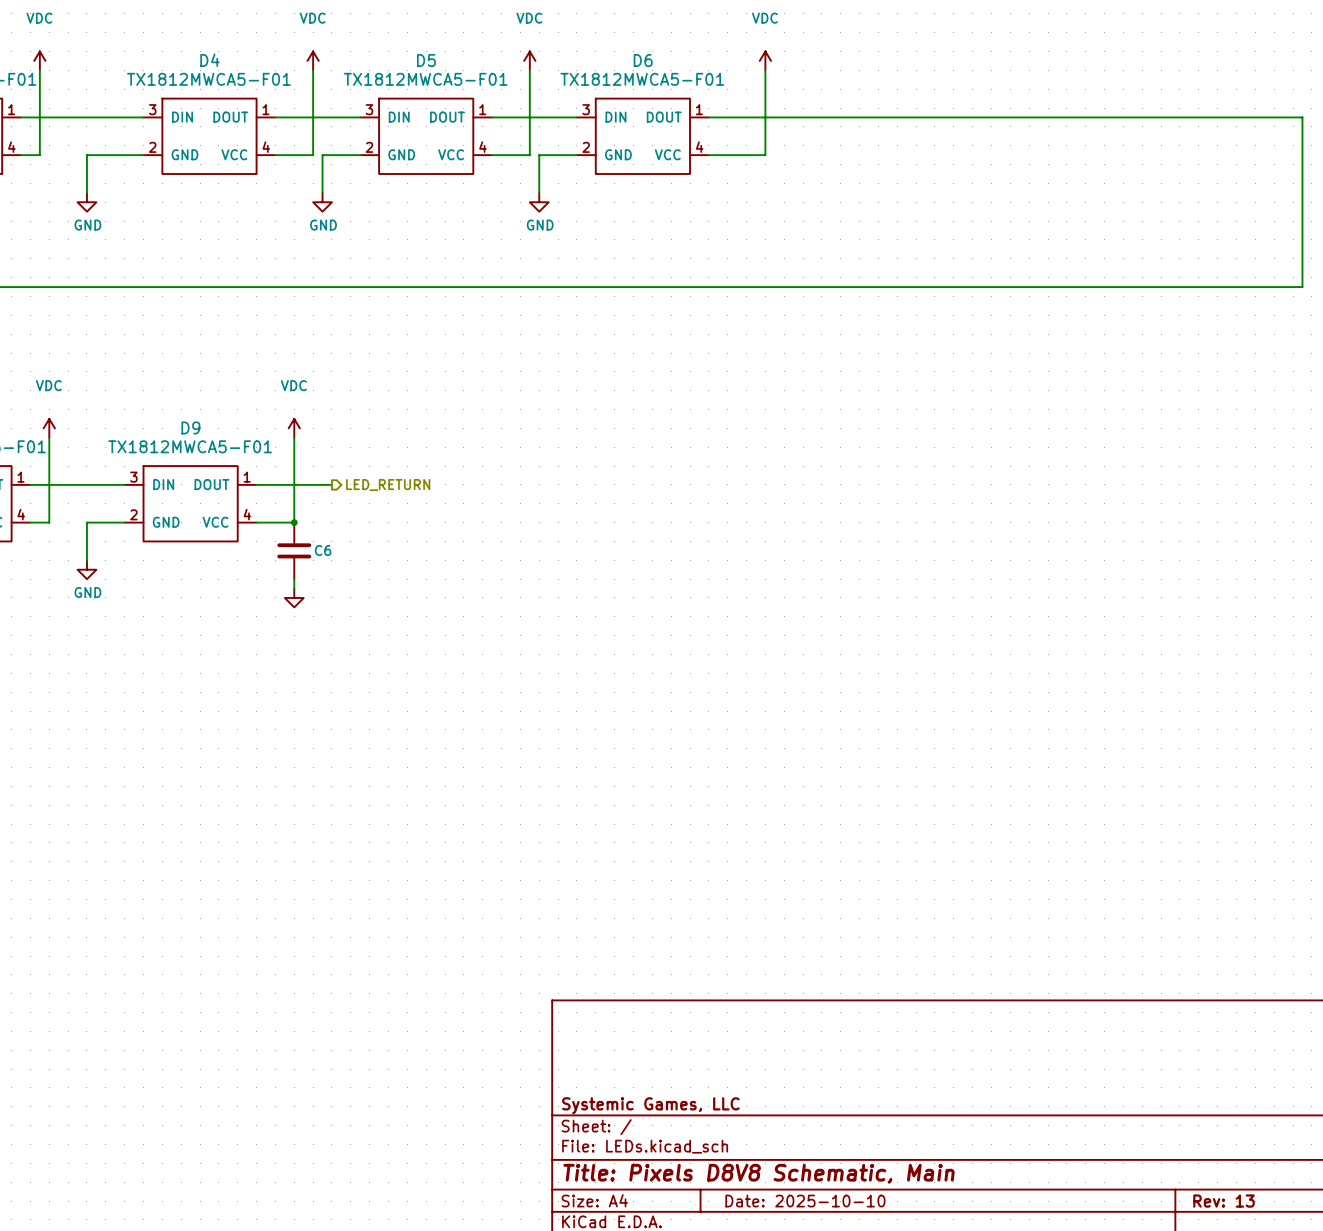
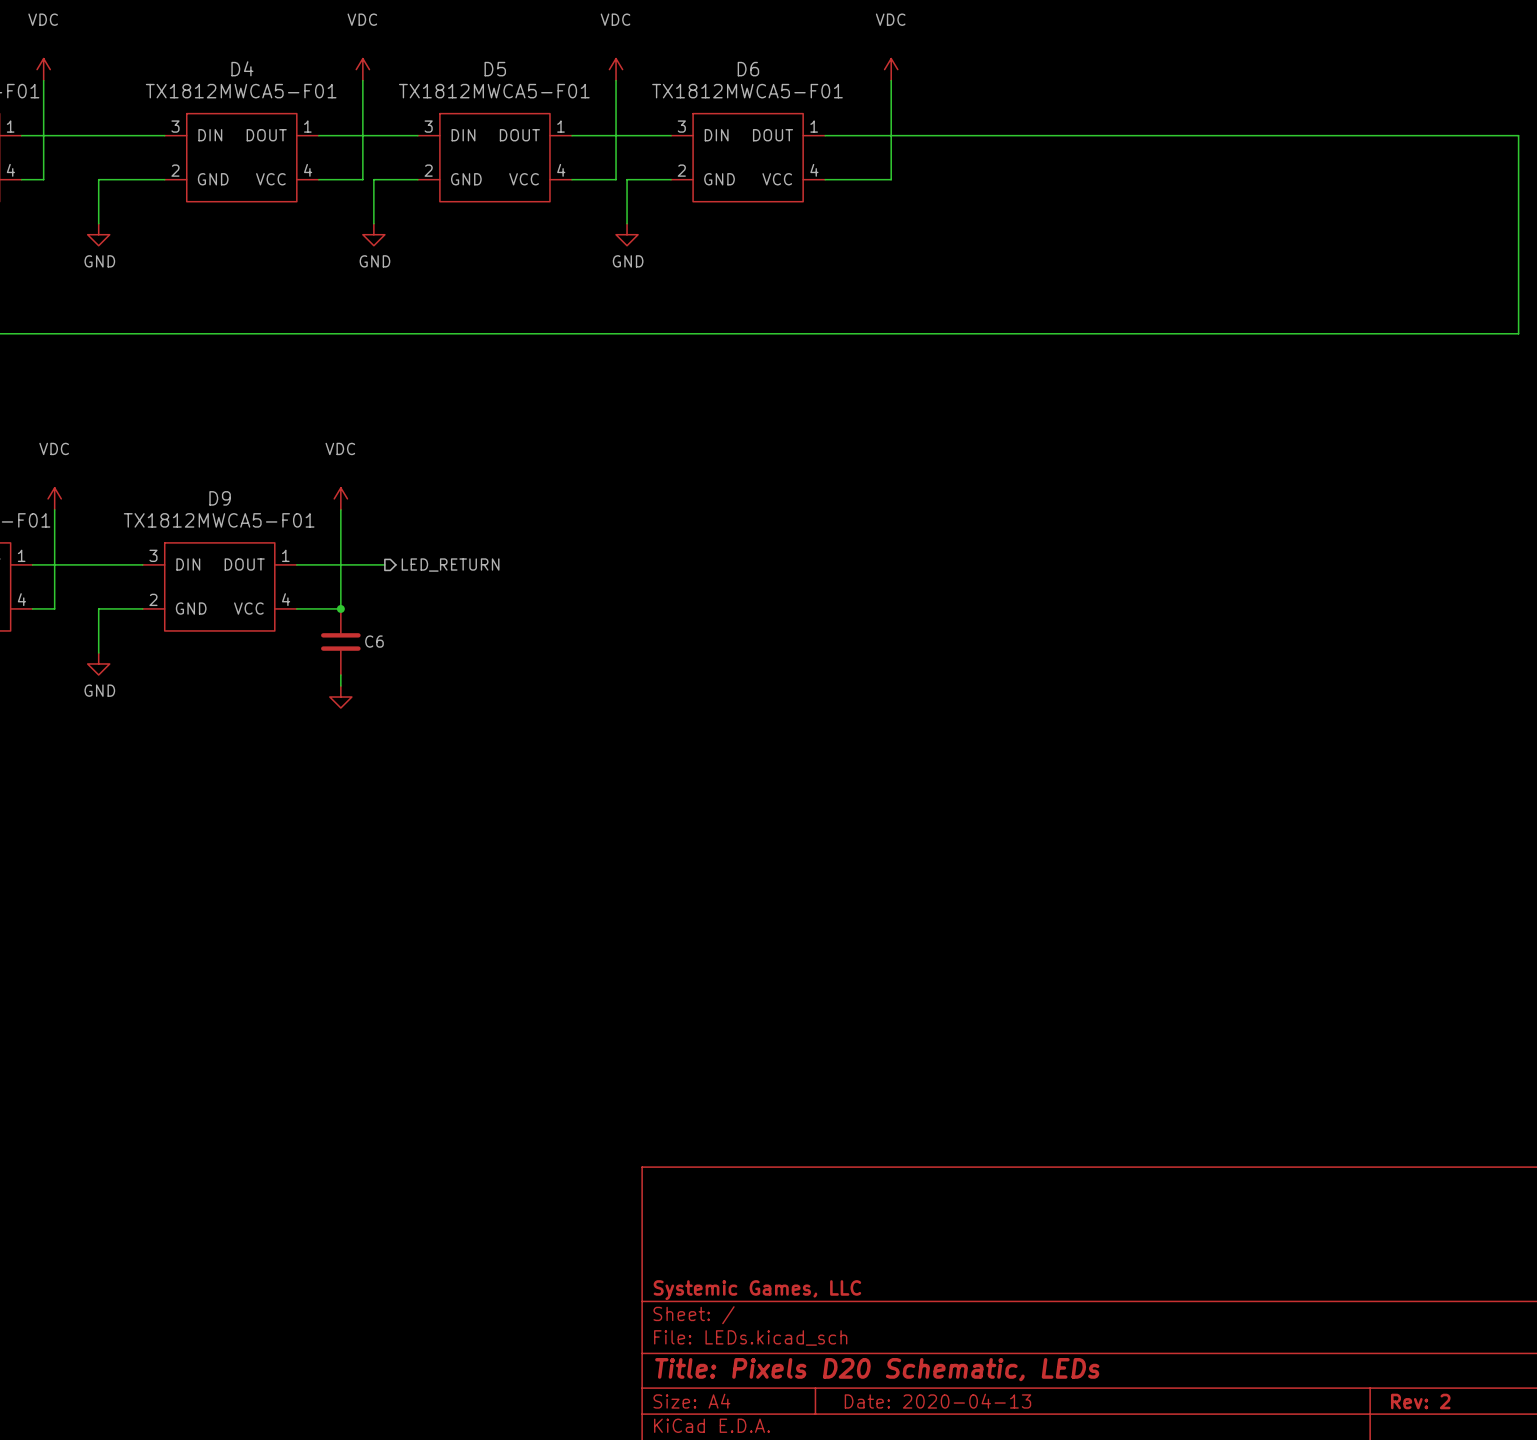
title block: Title: Pixels D8V8 Schematic, Main (759, 1173) -> Title: Pixels D20 Schematic, LEDs (877, 1369)
title block: Date: 2025-10-10 (805, 1201) -> Date: 2020-04-13 (937, 1401)
title block: Rev: 13 (1223, 1201) -> Rev: 2 (1420, 1401)

